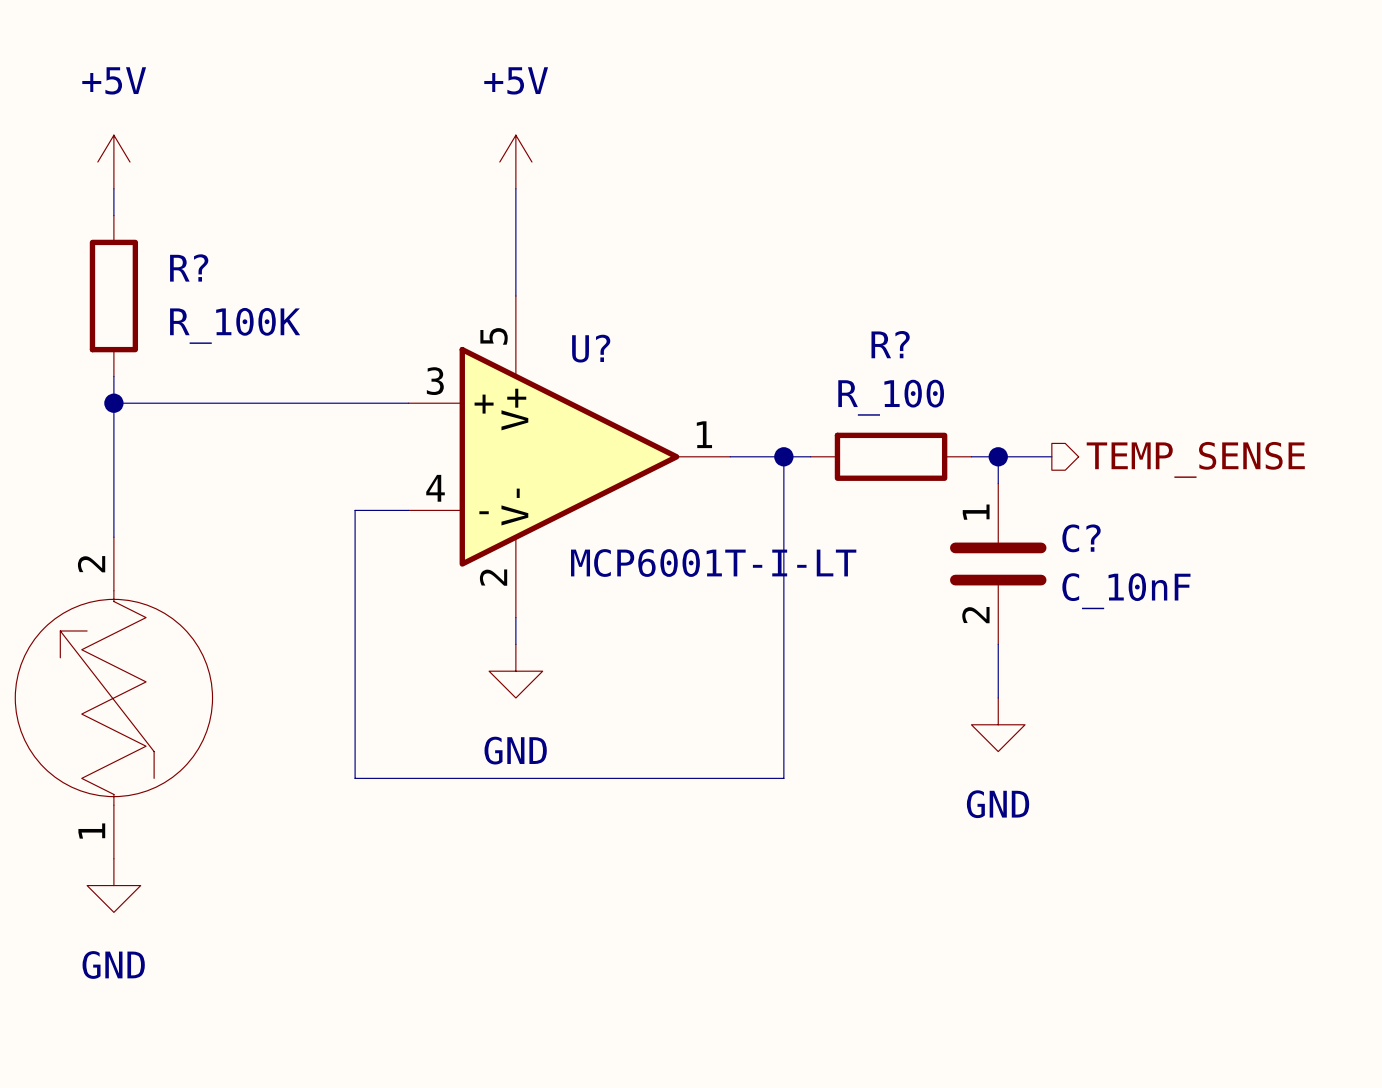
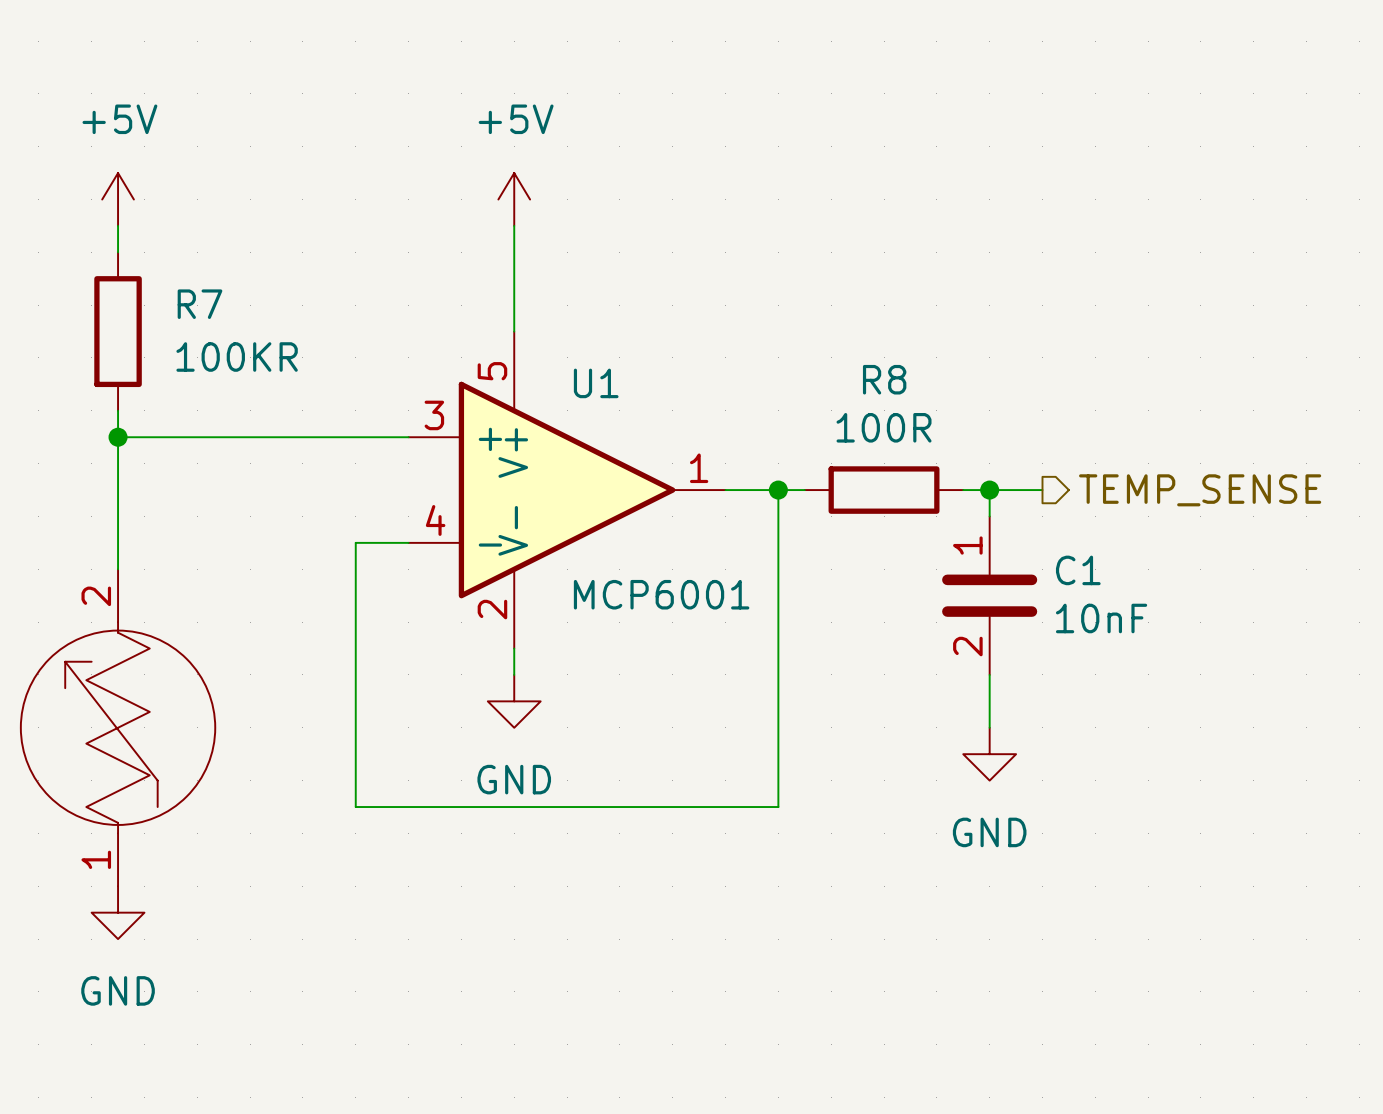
R? name: R? (189, 267) -> R7 (200, 304)
R? value: R_100K (235, 325) -> 100KR (237, 357)
R? name: R? (890, 344) -> R8 (884, 379)
U? name: U? (591, 348) -> U1 (596, 383)
R? value: R_100 (891, 397) -> 100R (884, 427)
C? name: C? (1081, 538) -> C1 (1078, 570)
U? value: MCP6001T-I-LT (713, 563) -> MCP6001 (661, 594)
C? value: C_10nF (1126, 591) -> 10nF (1101, 618)

